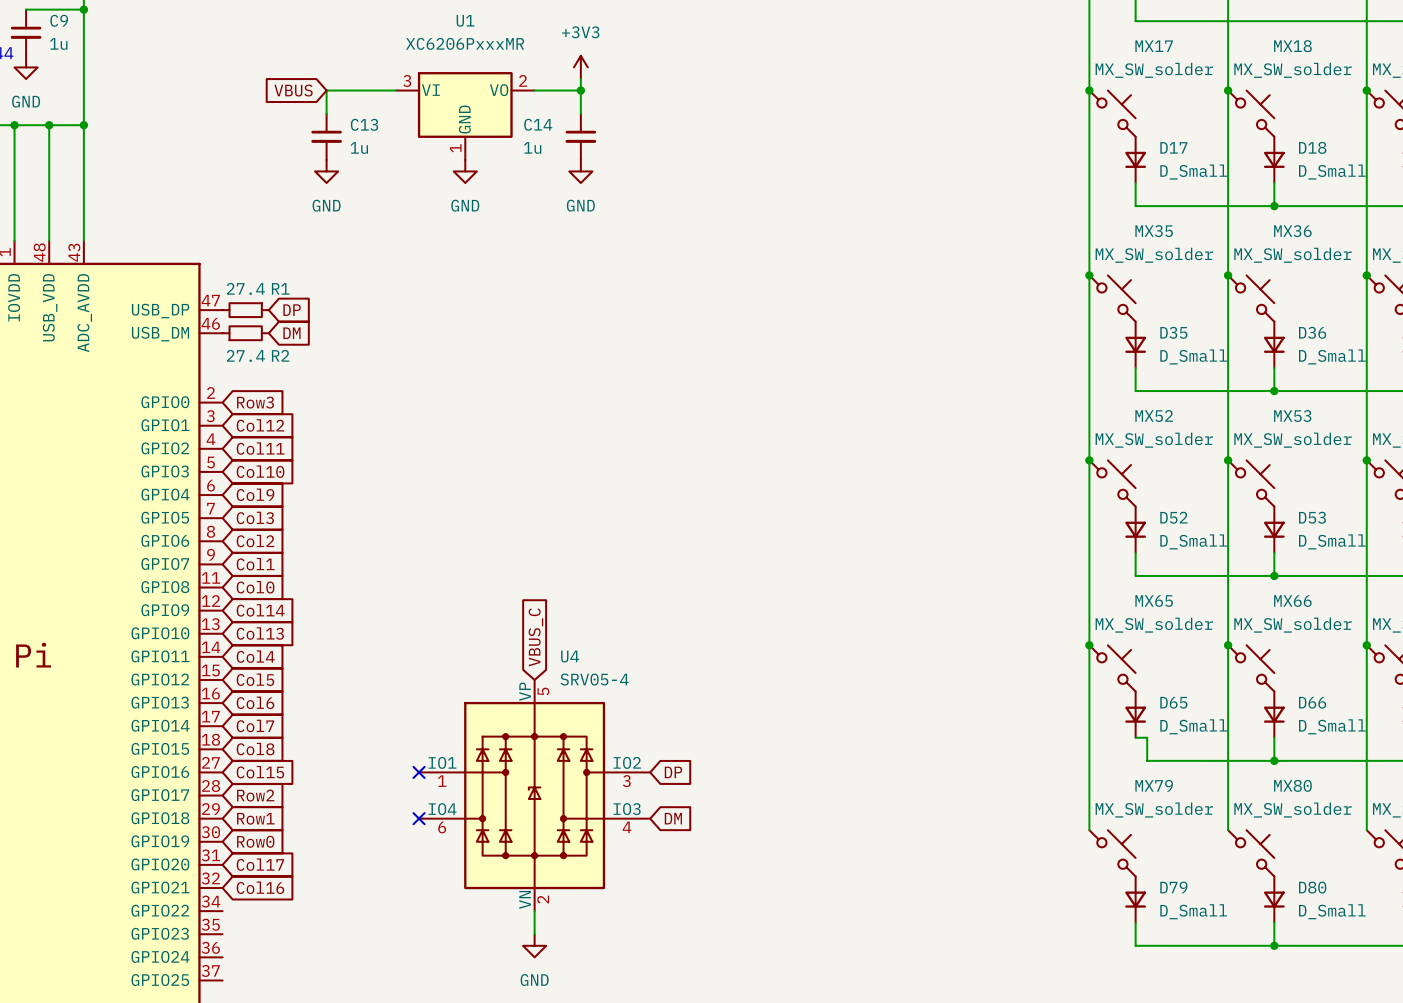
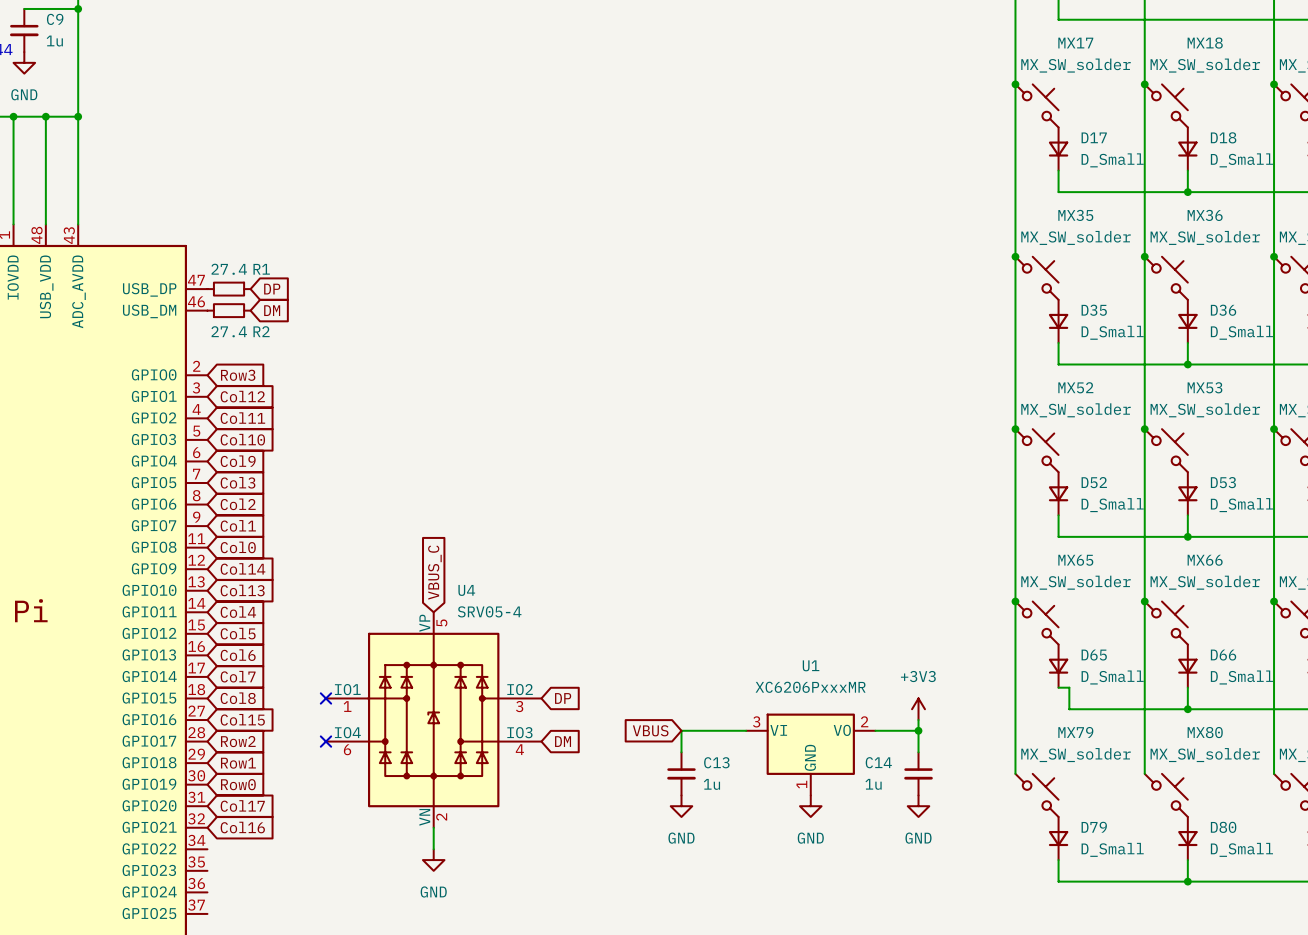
power symbol: +3V3 (580, 67) -> none
wire: (580, 78) (580, 113) -> none
global label: VBUS (293, 90) -> none
wire: (395, 90) (326, 90) (326, 113) -> none
wire: (534, 90) (580, 90) -> none
junction: (580, 90) -> none
U1 position: (465, 115) -> (810, 754)
C13 position: (326, 136) -> (681, 773)
C14 position: (580, 136) -> (918, 773)
power symbol: GND (326, 171) -> none
power symbol: GND (465, 171) -> none
power symbol: GND (580, 171) -> none
global label position: VBUS_C (535, 637) -> VBUS_C (434, 572)
no-connect mark: none -> (325, 698)
power symbol: none -> +3V3 (918, 709)
no-connect mark: (419, 772) -> none
global label position: DP (673, 772) -> DP (563, 698)
wire: none -> (918, 720) (918, 752)
global label: none -> VBUS (650, 730)
wire: none -> (746, 730) (681, 730) (681, 752)
wire: none -> (875, 730) (918, 730)
junction: none -> (918, 730)
no-connect mark: none -> (325, 741)
U4 position: (534, 795) -> (433, 720)
no-connect mark: (419, 818) -> none
global label position: DM (673, 818) -> DM (563, 741)
power symbol: none -> GND (681, 806)
power symbol: none -> GND (810, 806)
power symbol: none -> GND (918, 806)
wire: (534, 911) (534, 934) -> (433, 827) (433, 849)
power symbol position: GND (534, 945) -> GND (433, 860)

